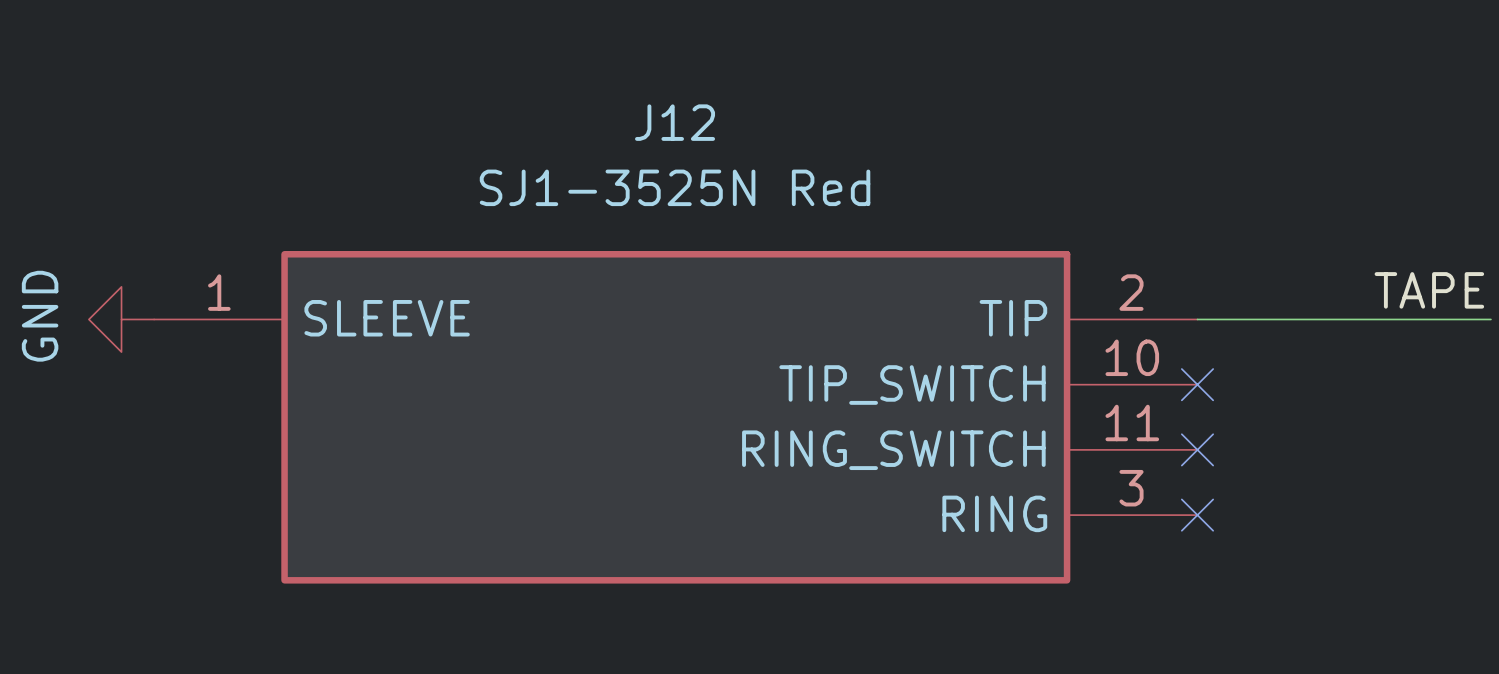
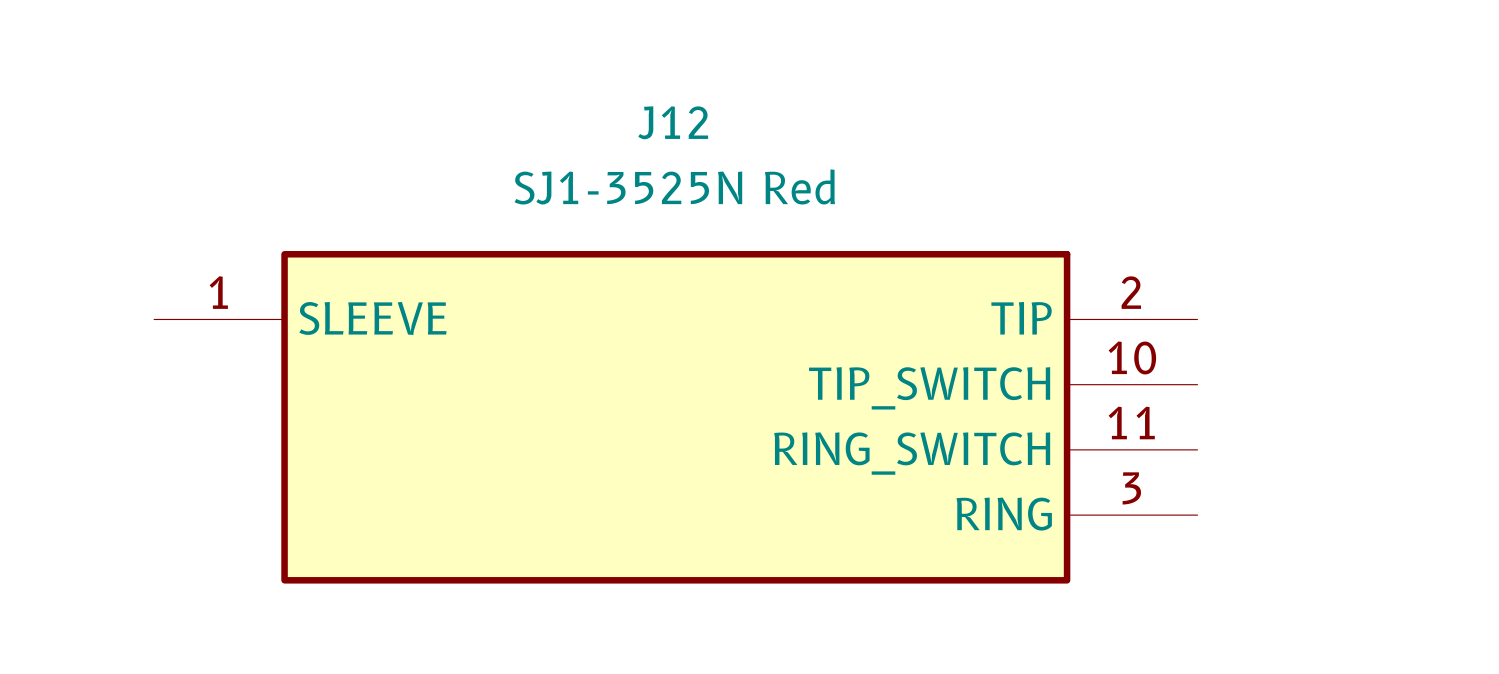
label: TAPE (1429, 290) -> none
power symbol: GND (121, 319) -> none
wire: (1197, 319) (1490, 319) -> none
no-connect mark: (1197, 384) -> none
no-connect mark: (1197, 449) -> none
no-connect mark: (1197, 515) -> none

